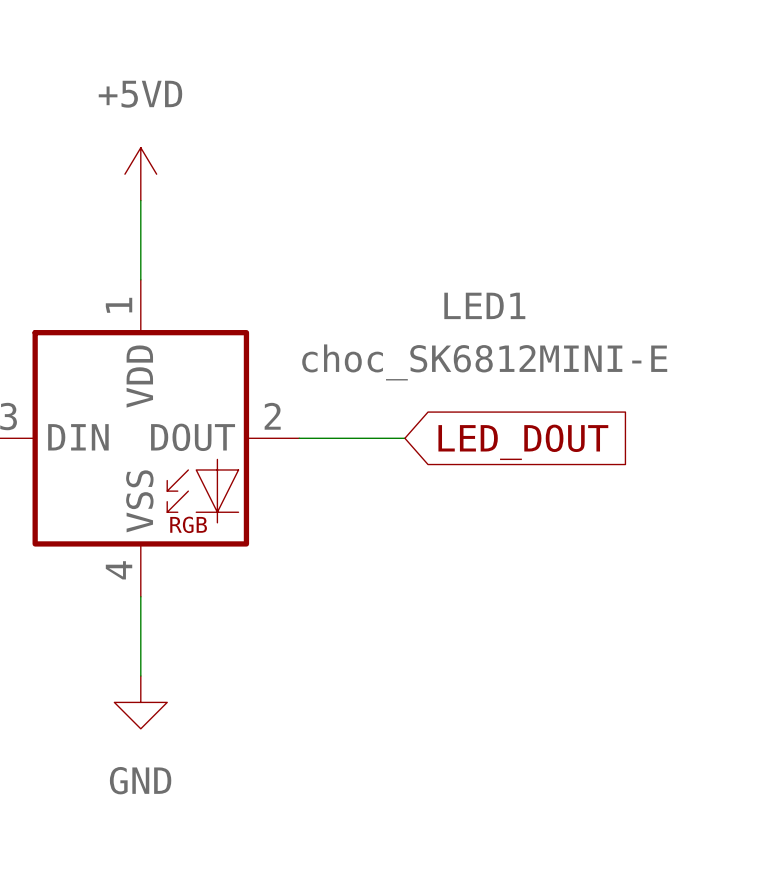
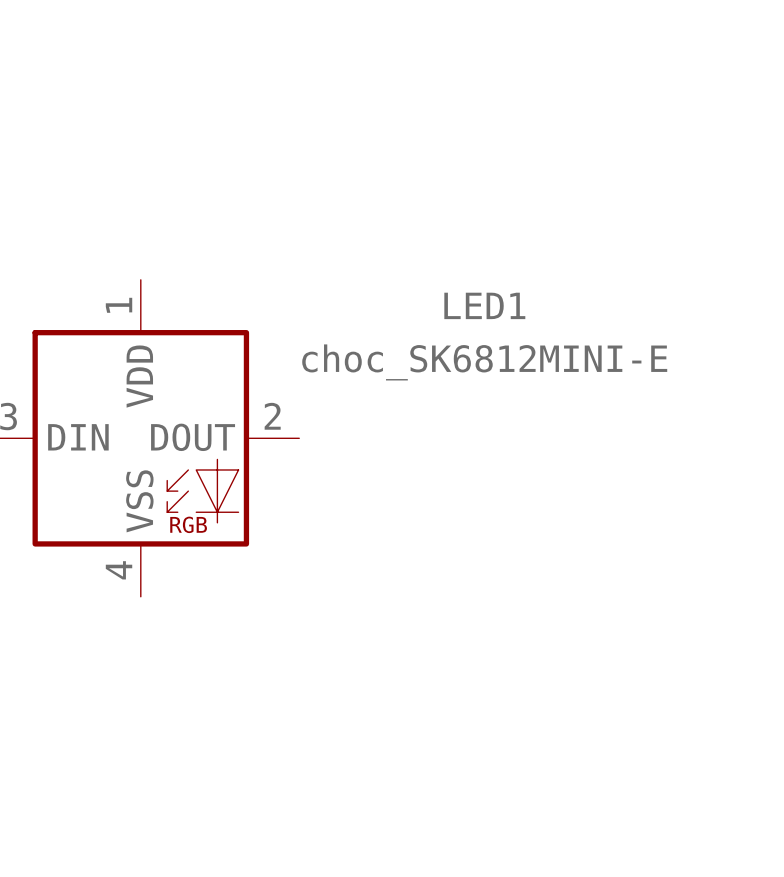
power symbol: +5VD (140, 174) -> none
wire: (140, 200) (140, 279) -> none
wire: (299, 438) (404, 438) -> none
global label: LED_DOUT (523, 442) -> none
wire: (140, 596) (140, 676) -> none
power symbol: GND (140, 702) -> none

